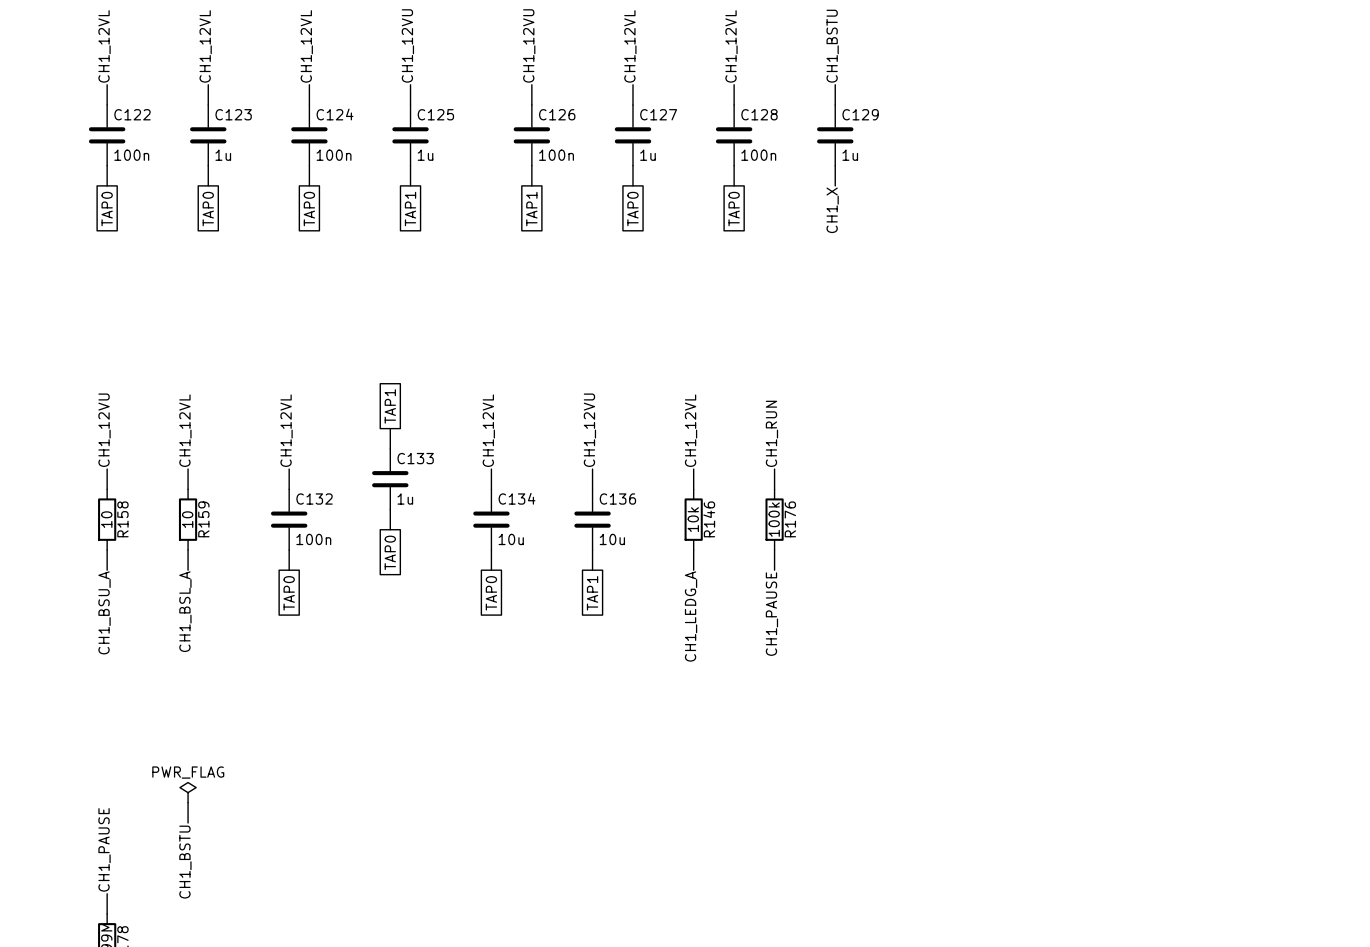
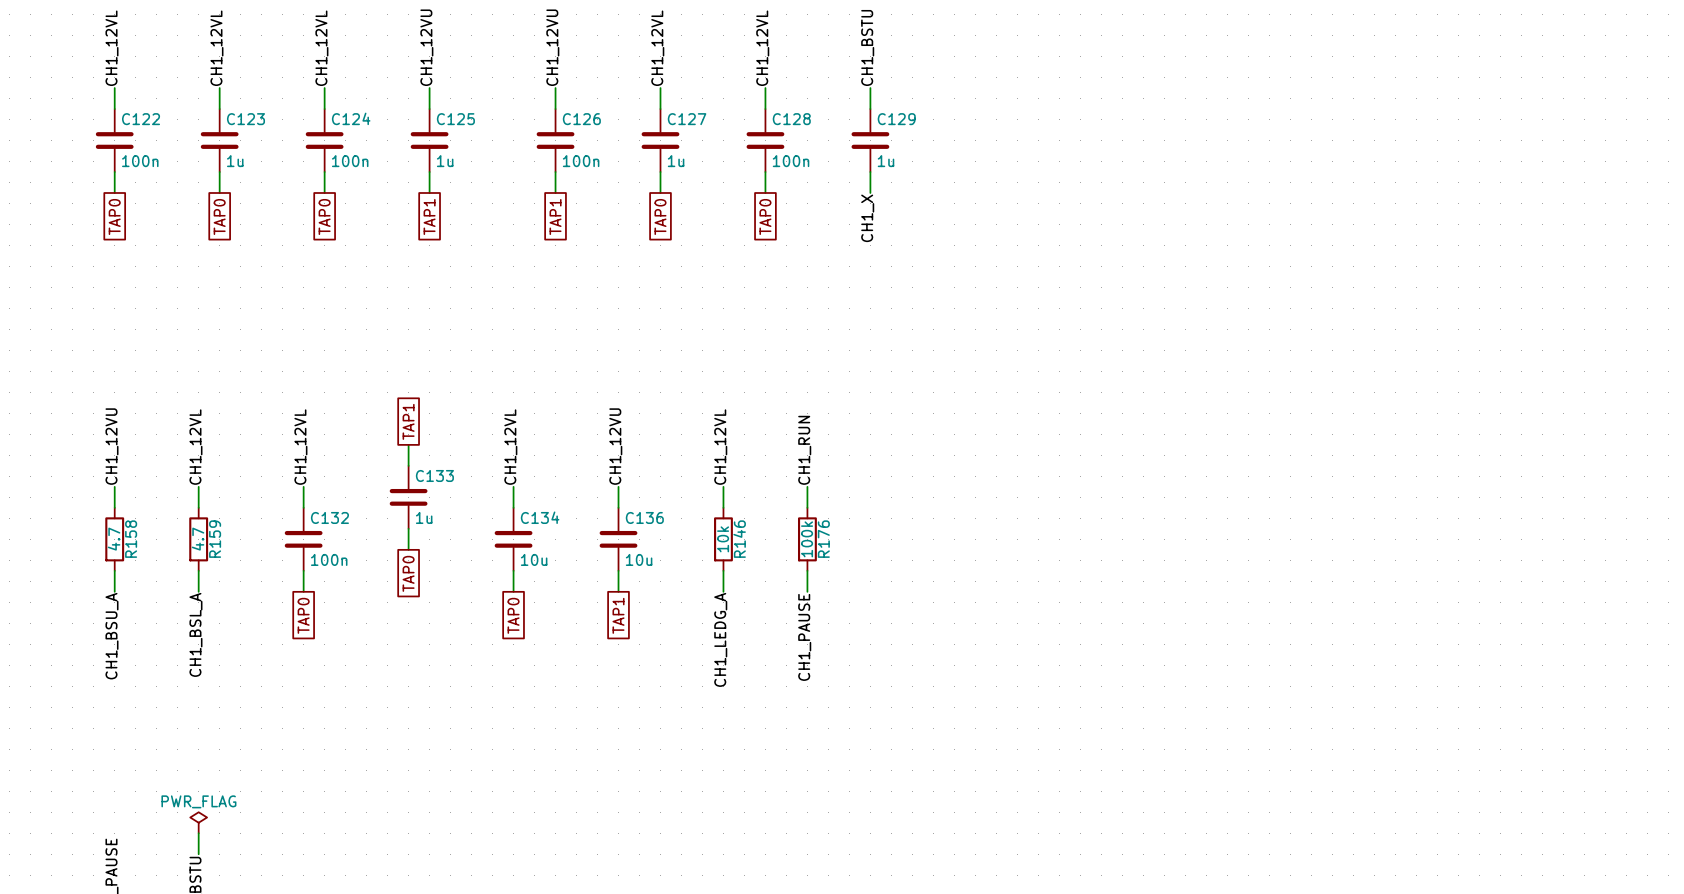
R158 value: 10 (106, 519) -> 4.7 (114, 539)
R159 value: 10 (187, 519) -> 4.7 (198, 539)

